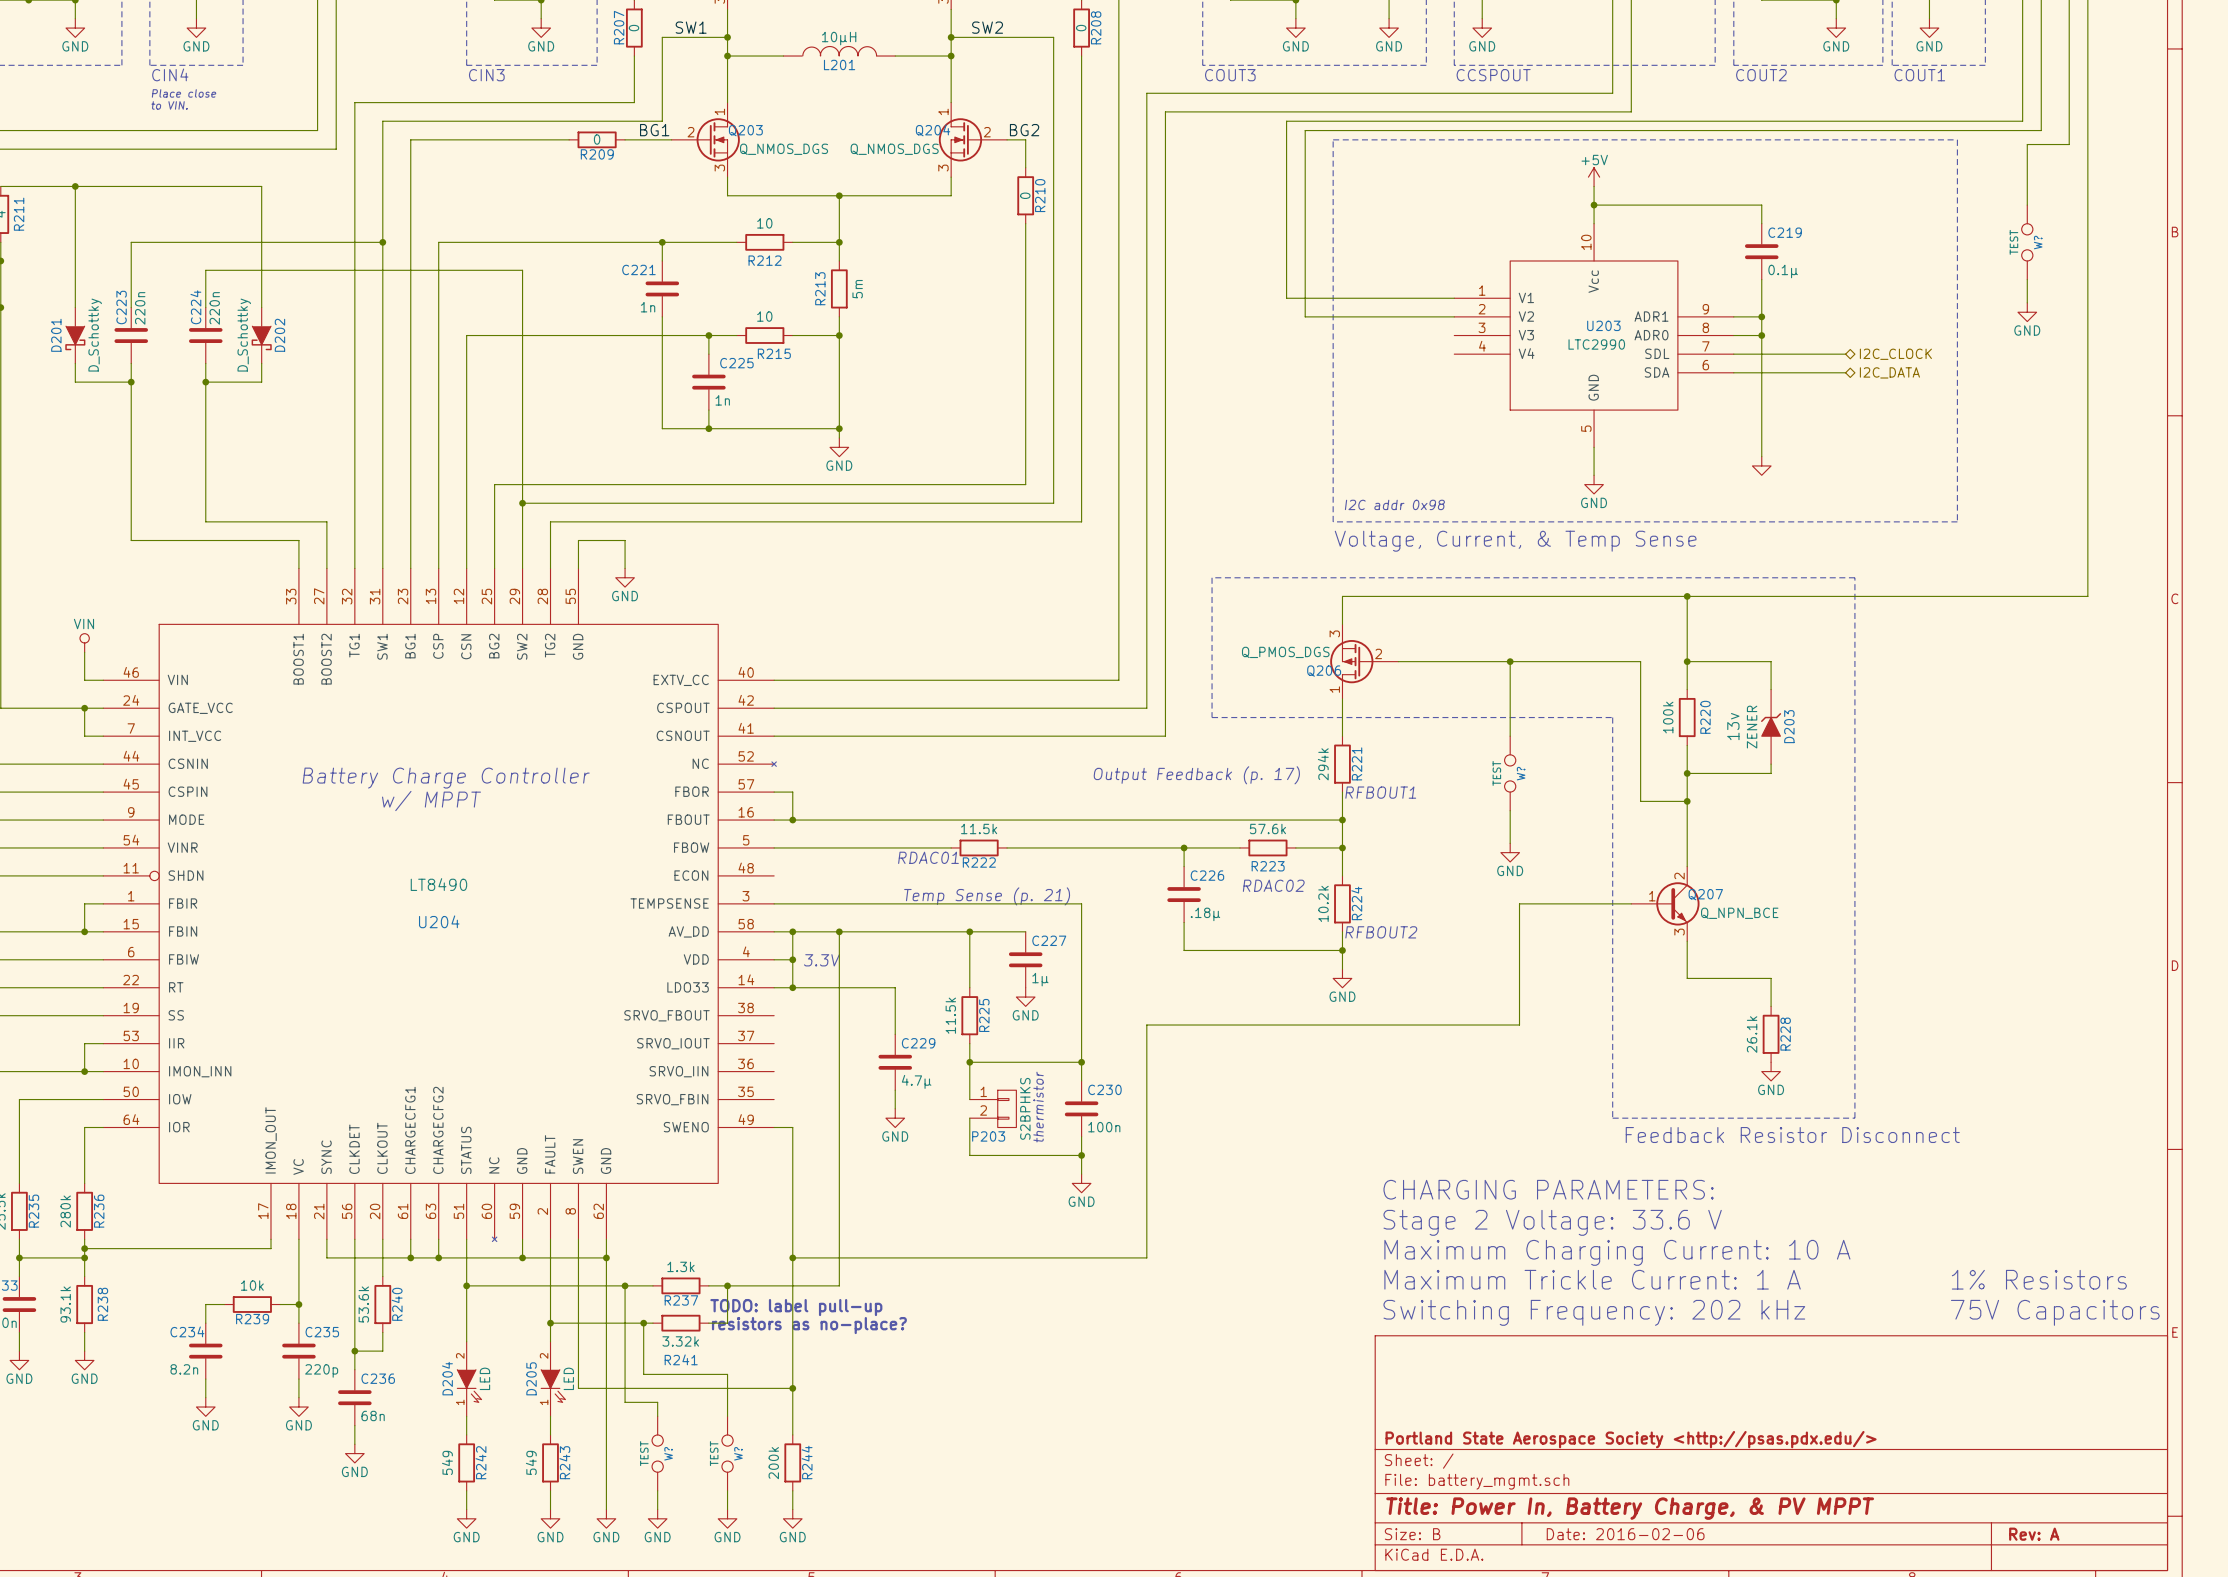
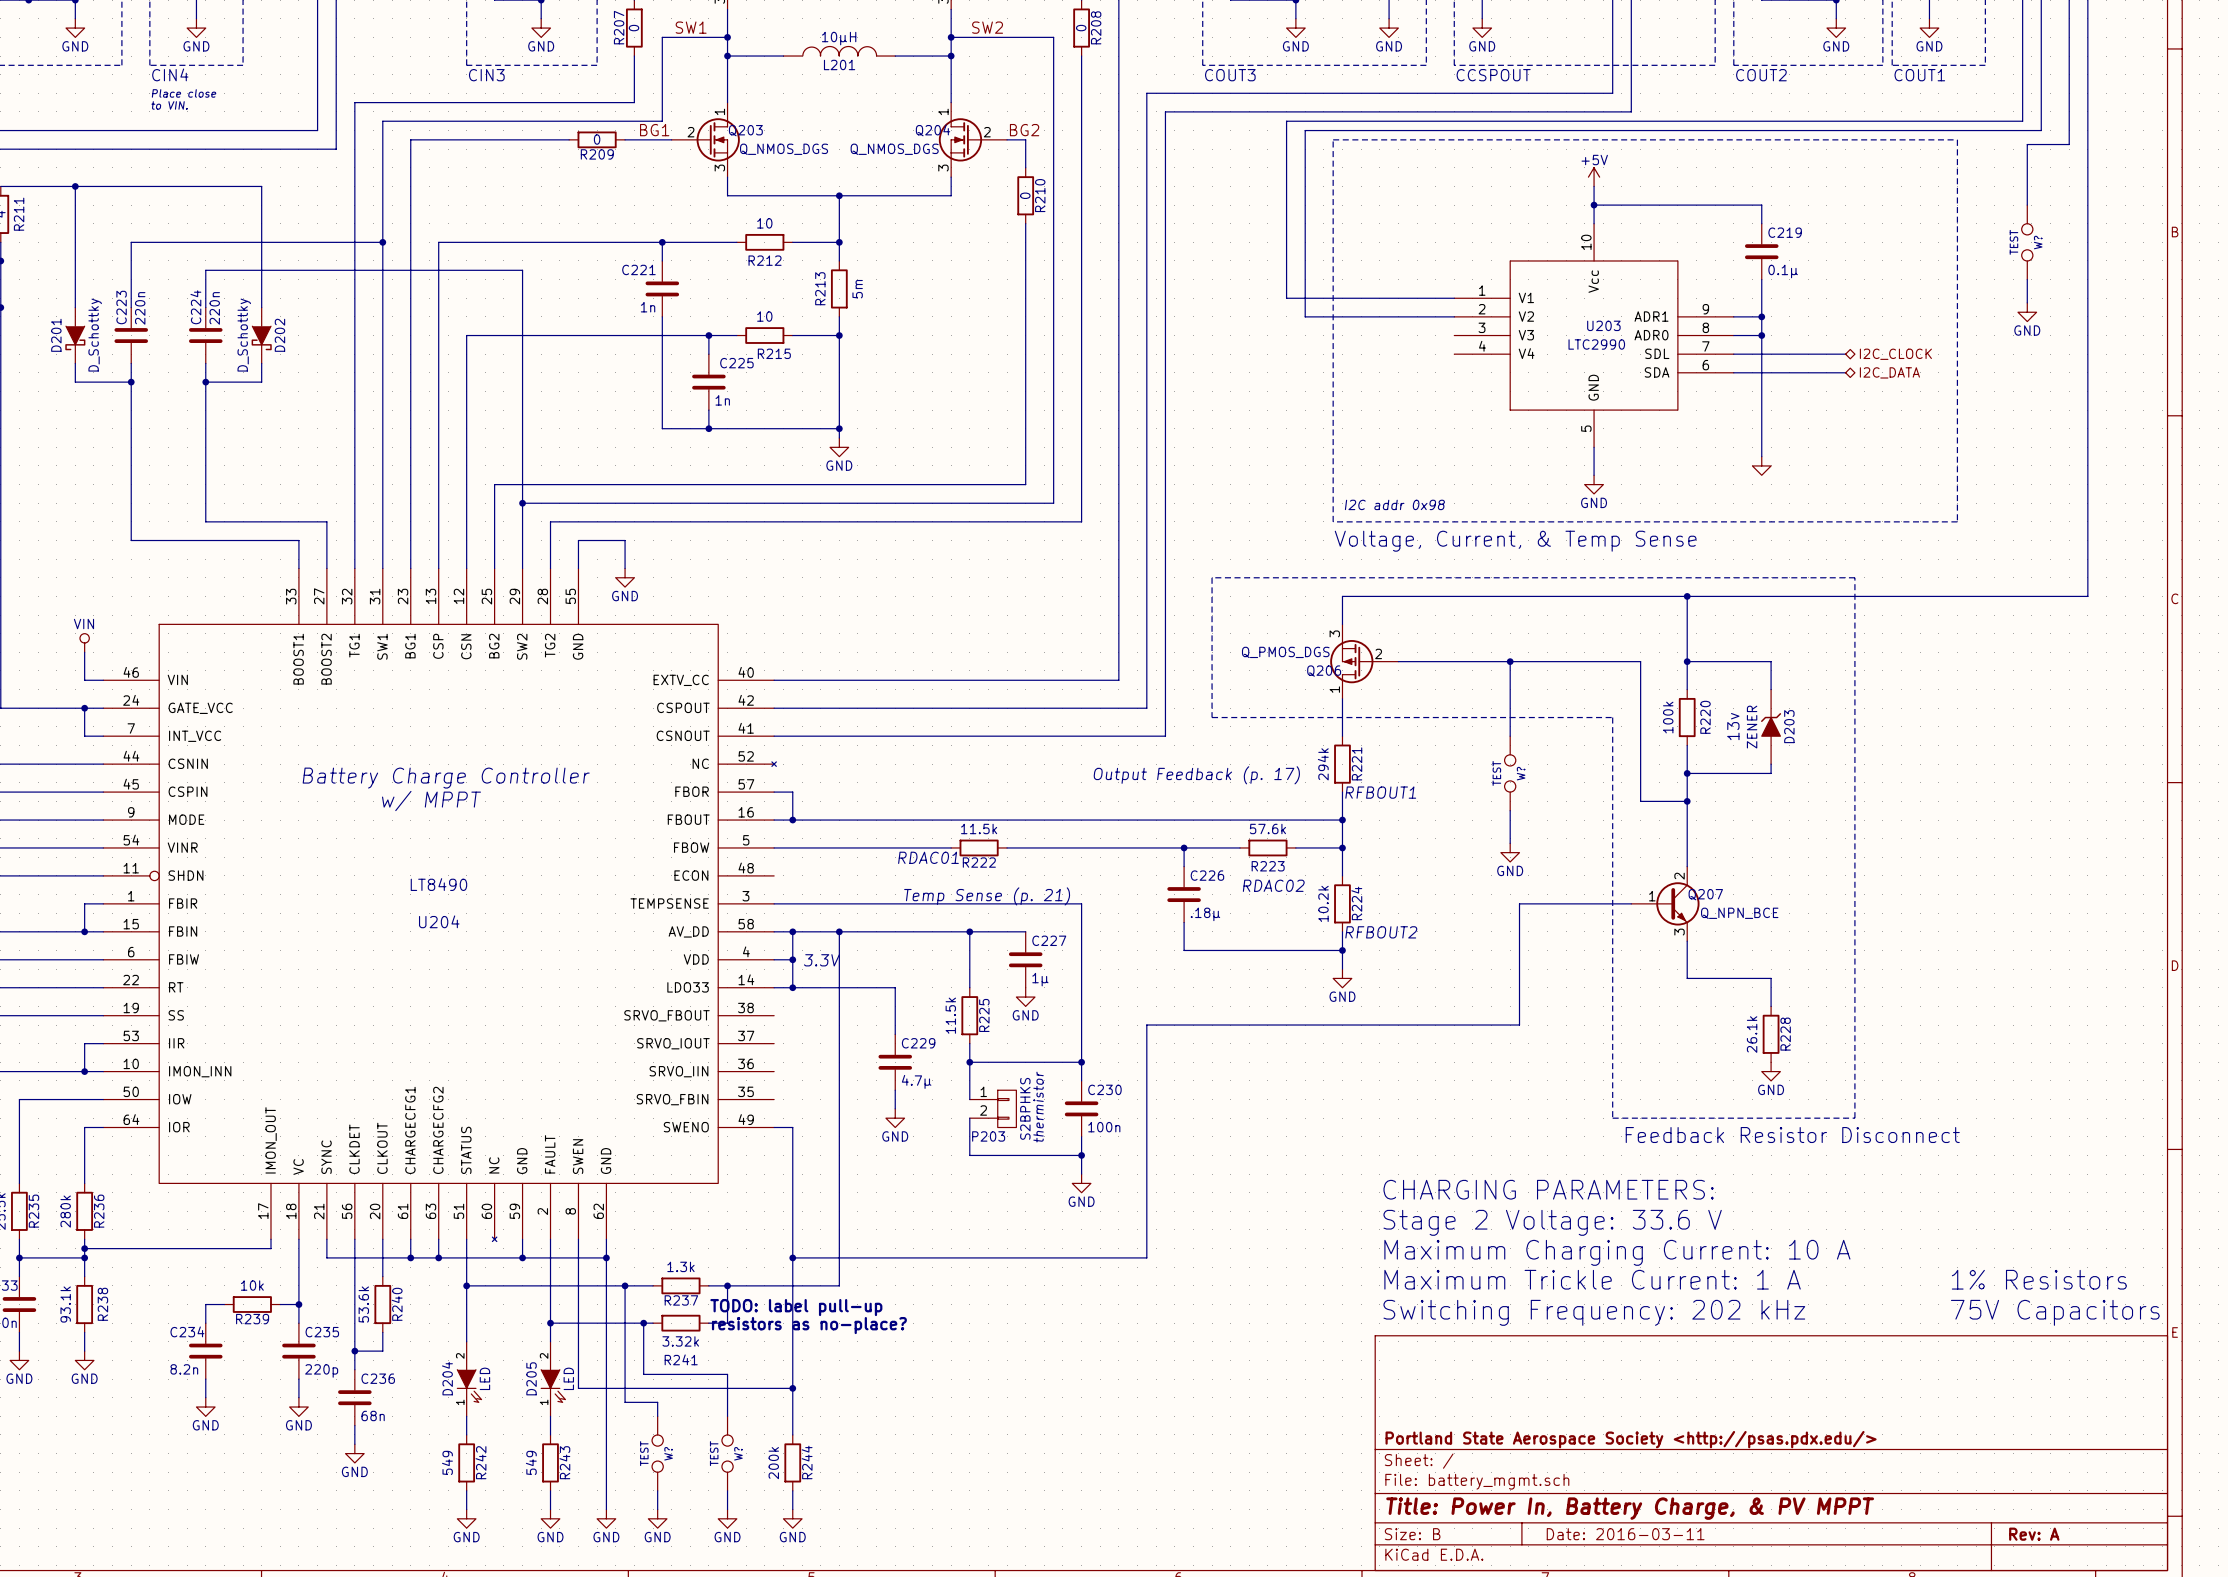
title block: Date: 2016-02-06 (1625, 1534) -> Date: 2016-03-11 (1625, 1534)

